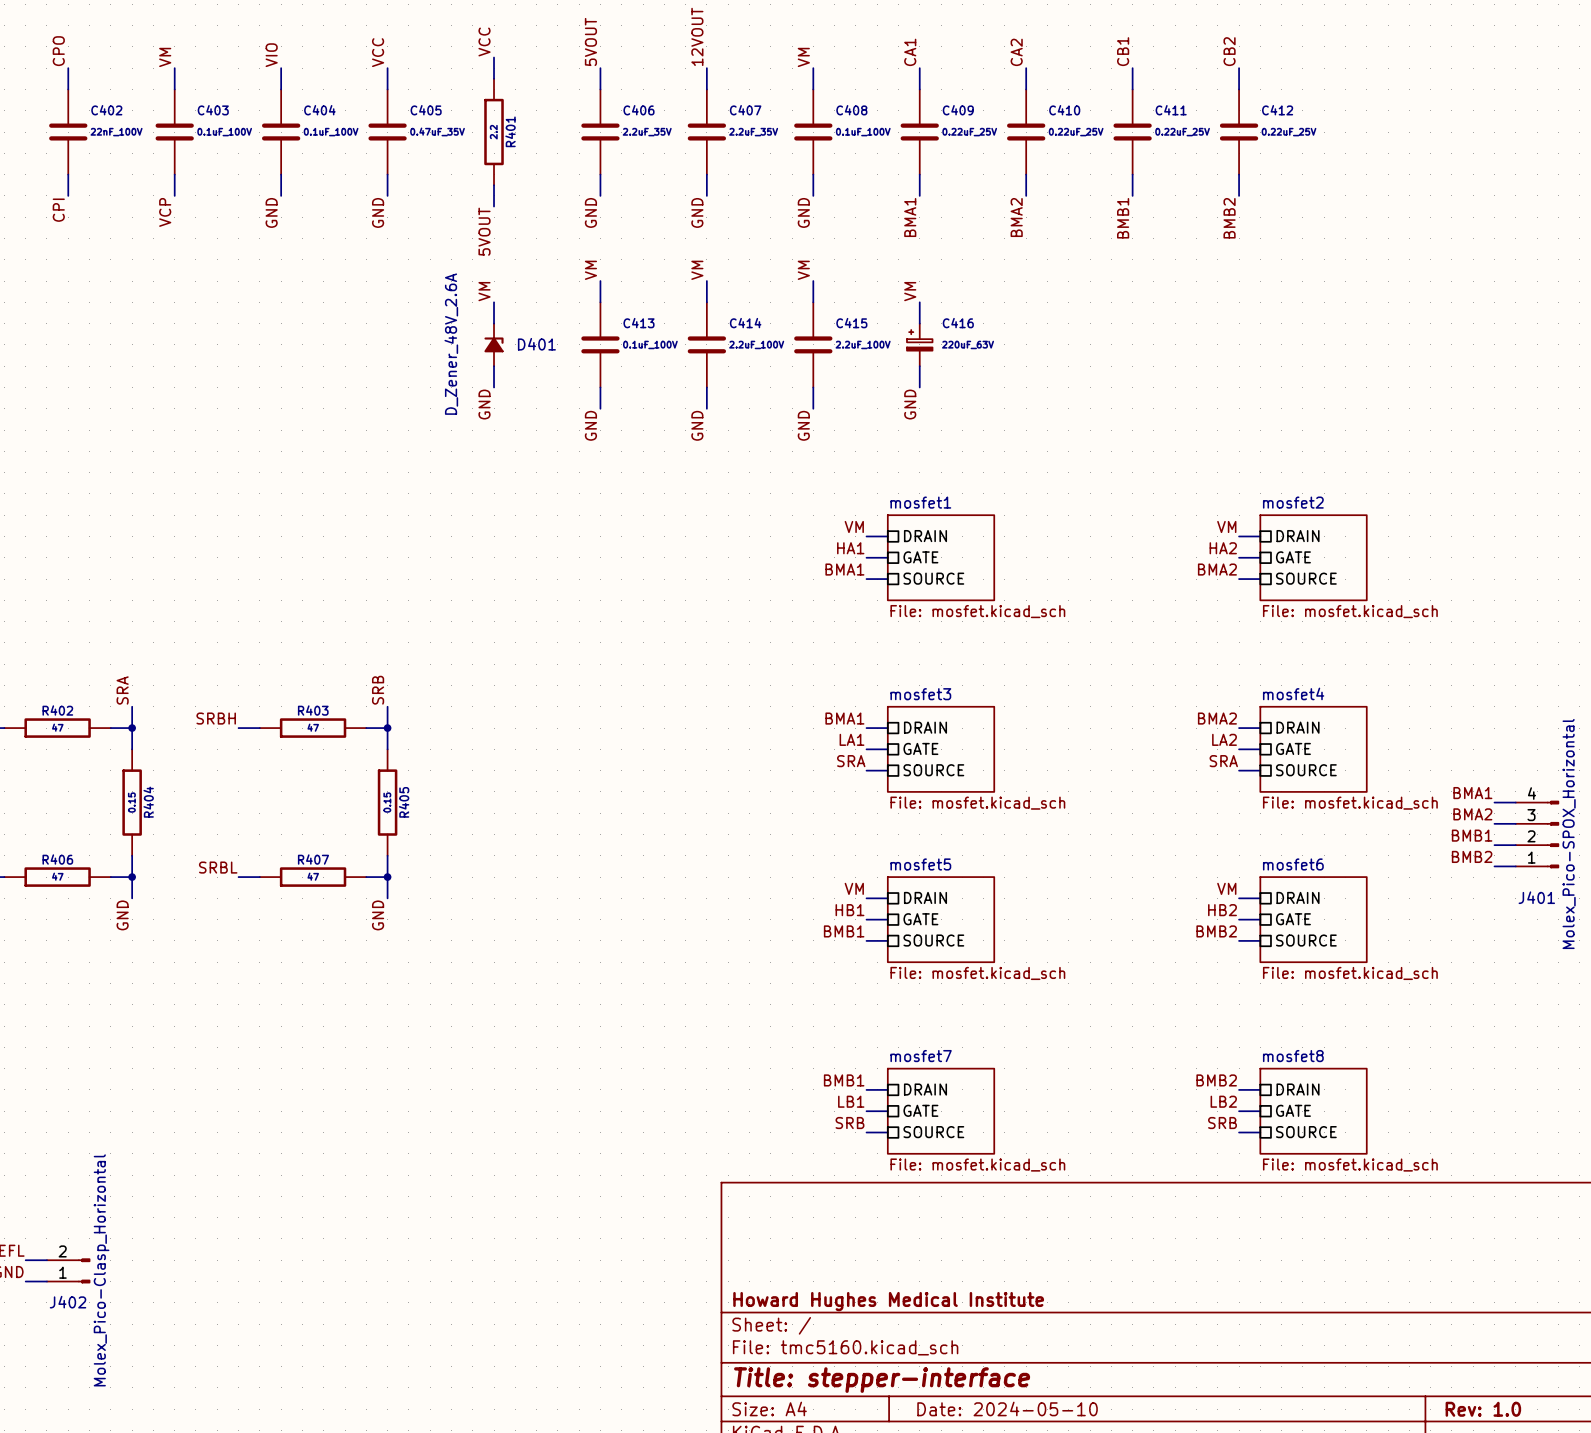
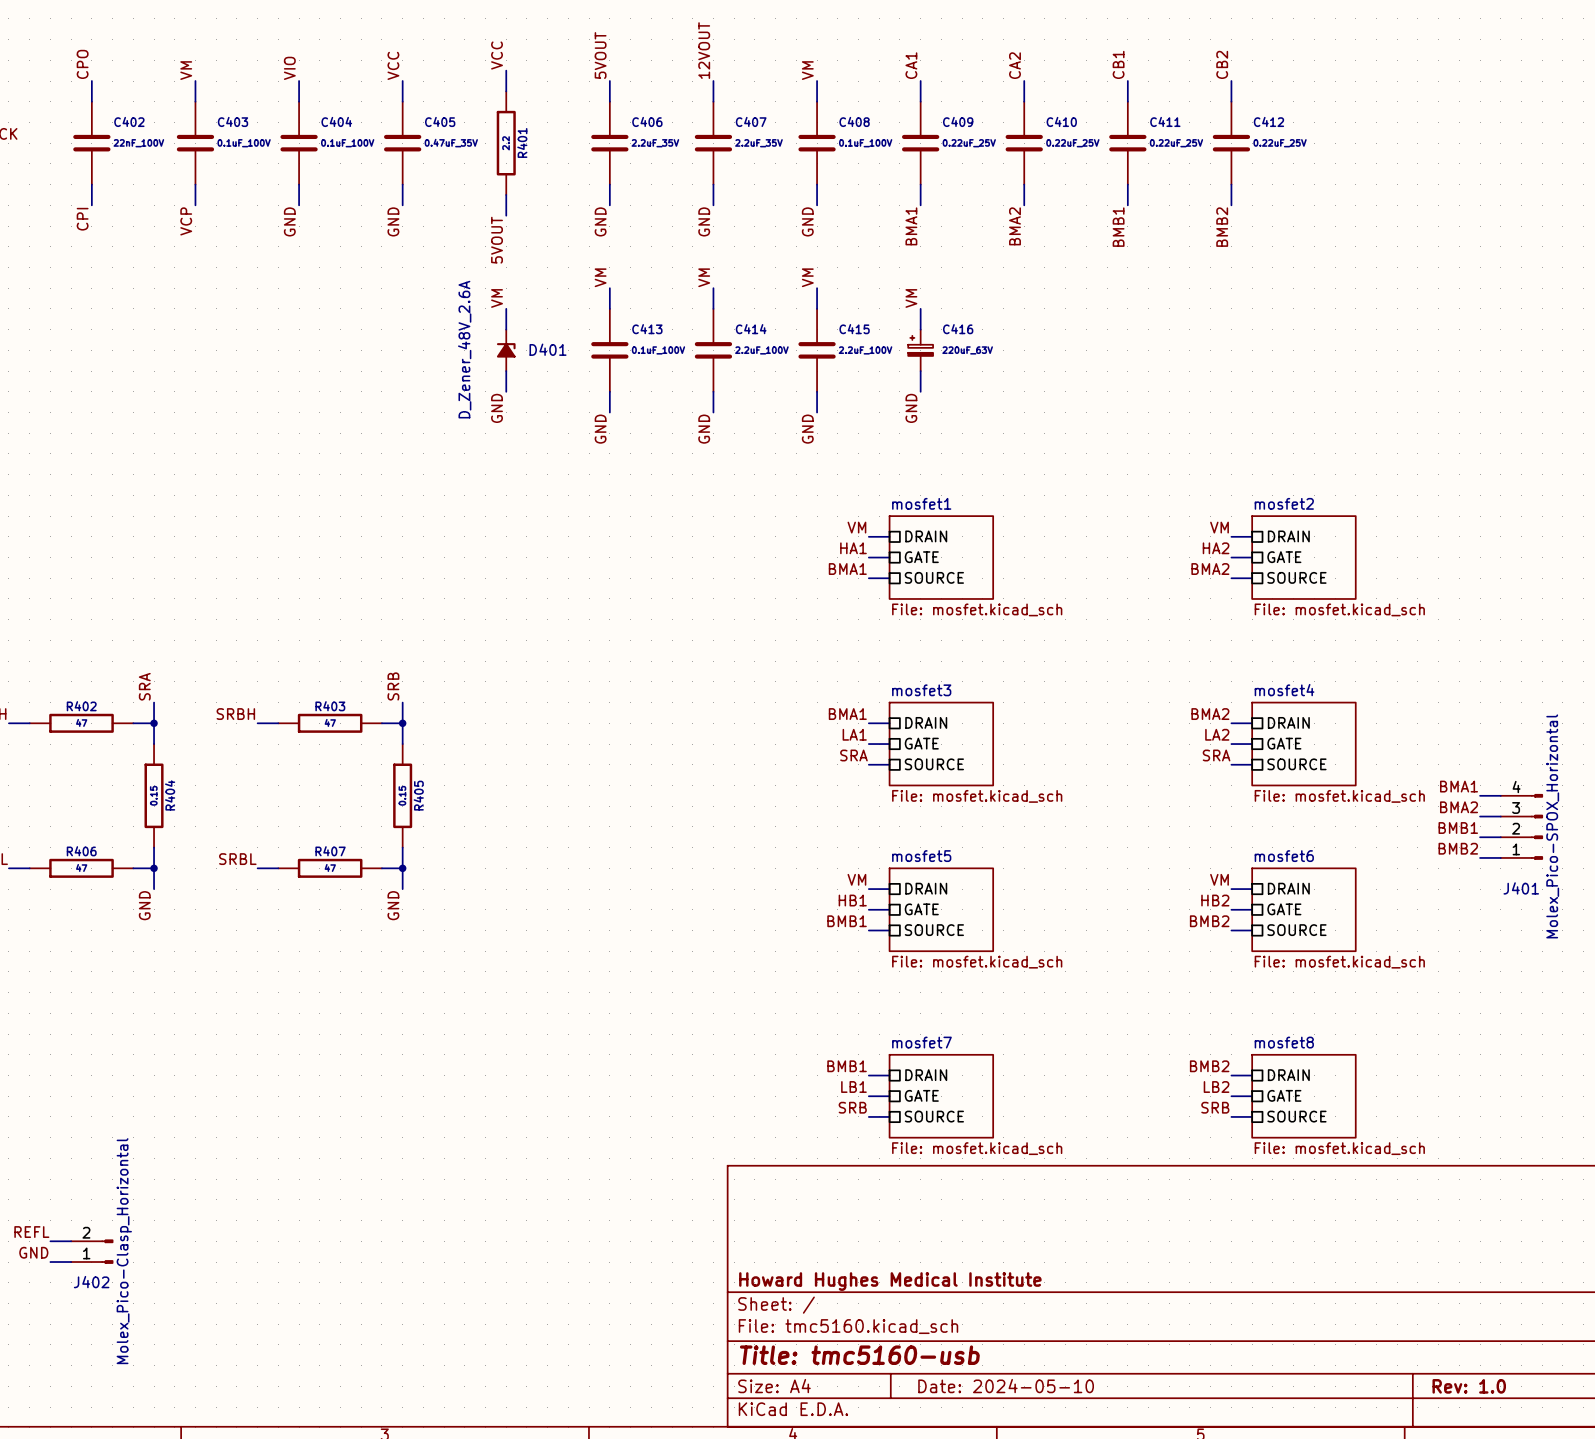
title block: Title: stepper-interface (882, 1380) -> Title: tmc5160-usb (859, 1355)

